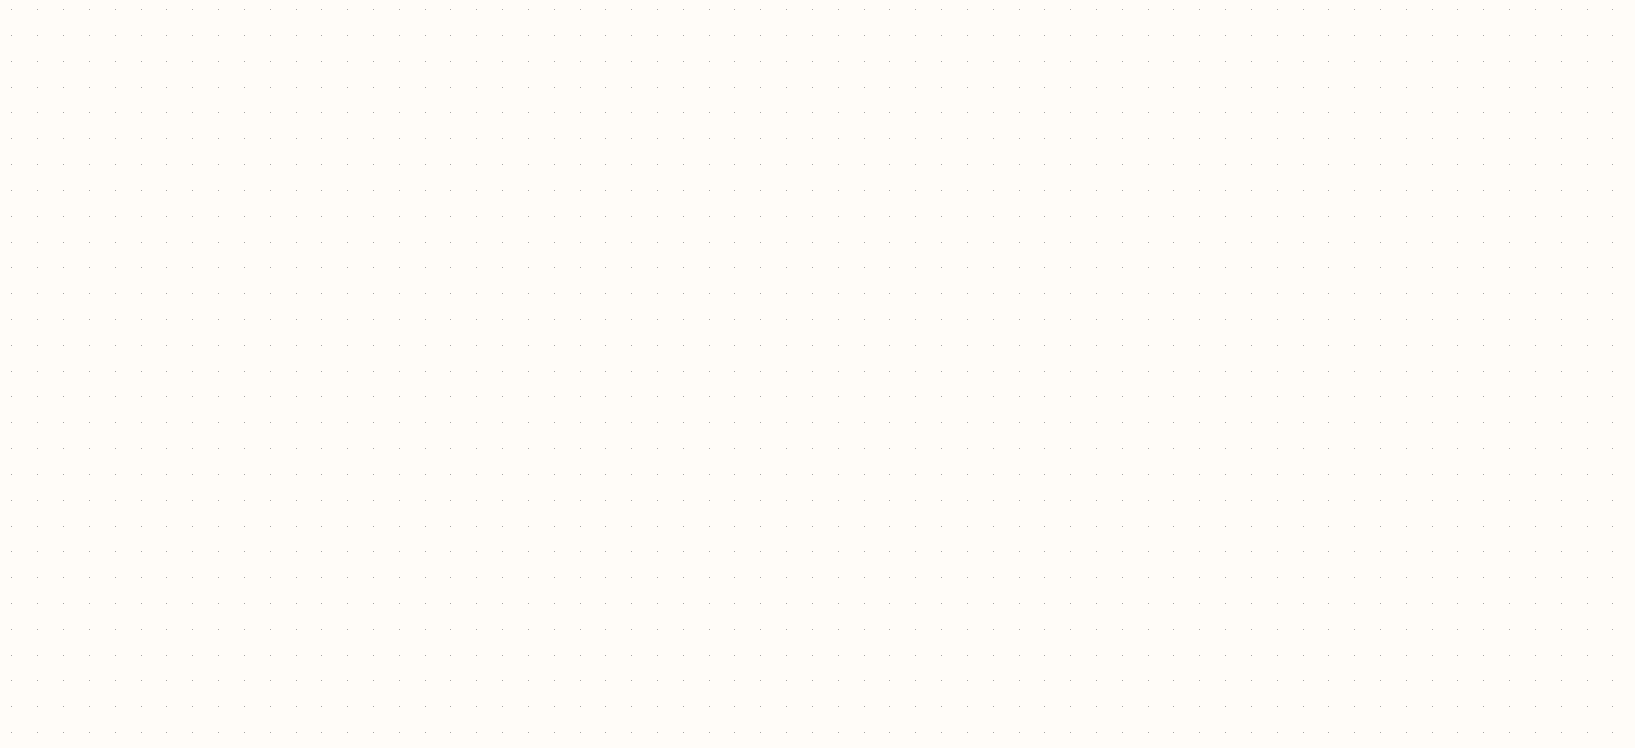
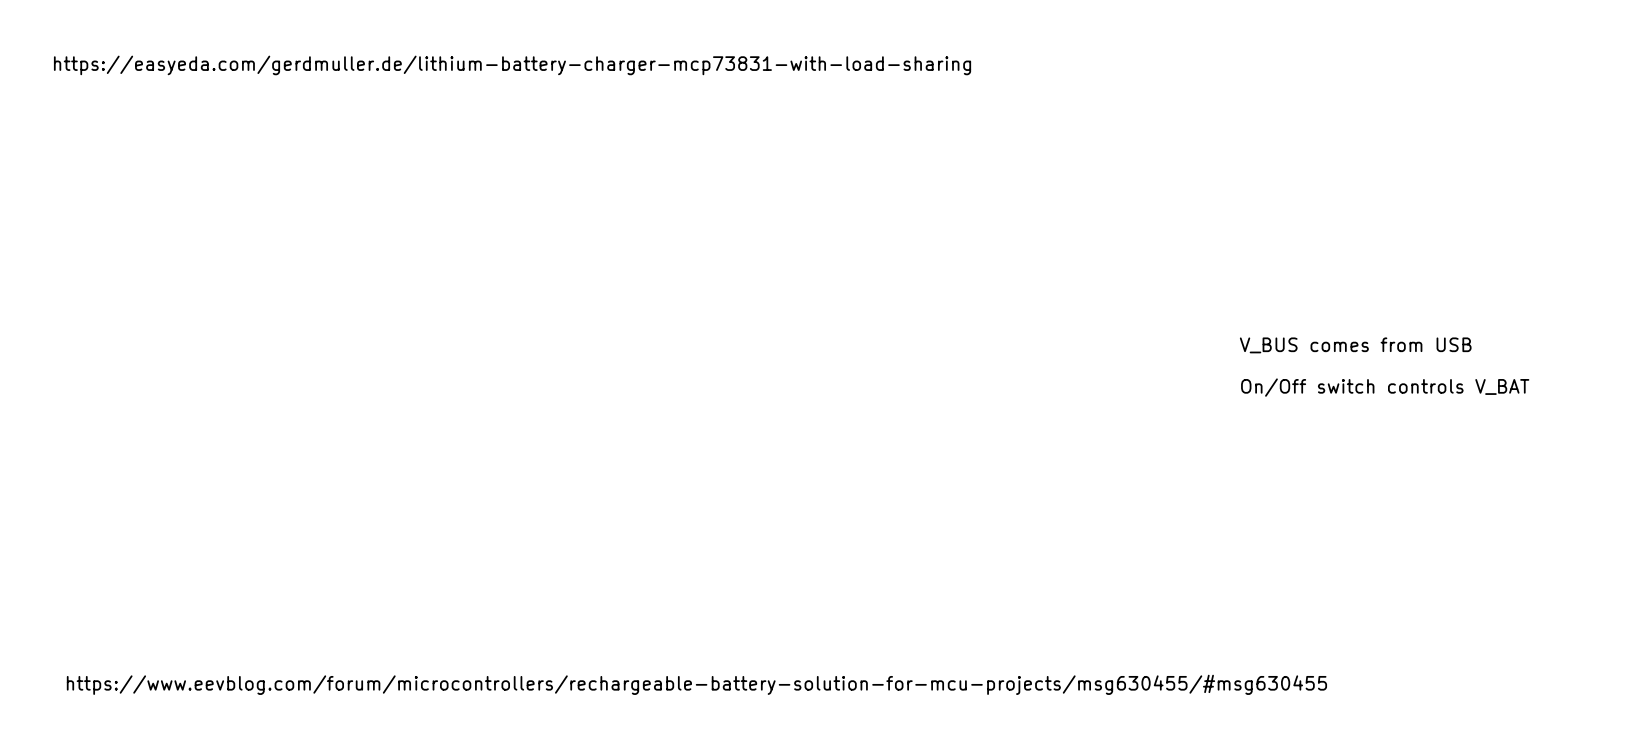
text: none -> https://easyeda.com/gerdmuller.de/lithium-battery-charger-mcp73831-with-load-sharing (512, 65)
text: none -> V_BUS comes from USB (1355, 345)
text: none -> On/Off switch controls V_BAT (1385, 387)
text: none -> https://www.eevblog.com/forum/microcontrollers/rechargeable-battery-solution-for-mcu-projects/msg630455/#msg630455 (696, 684)

